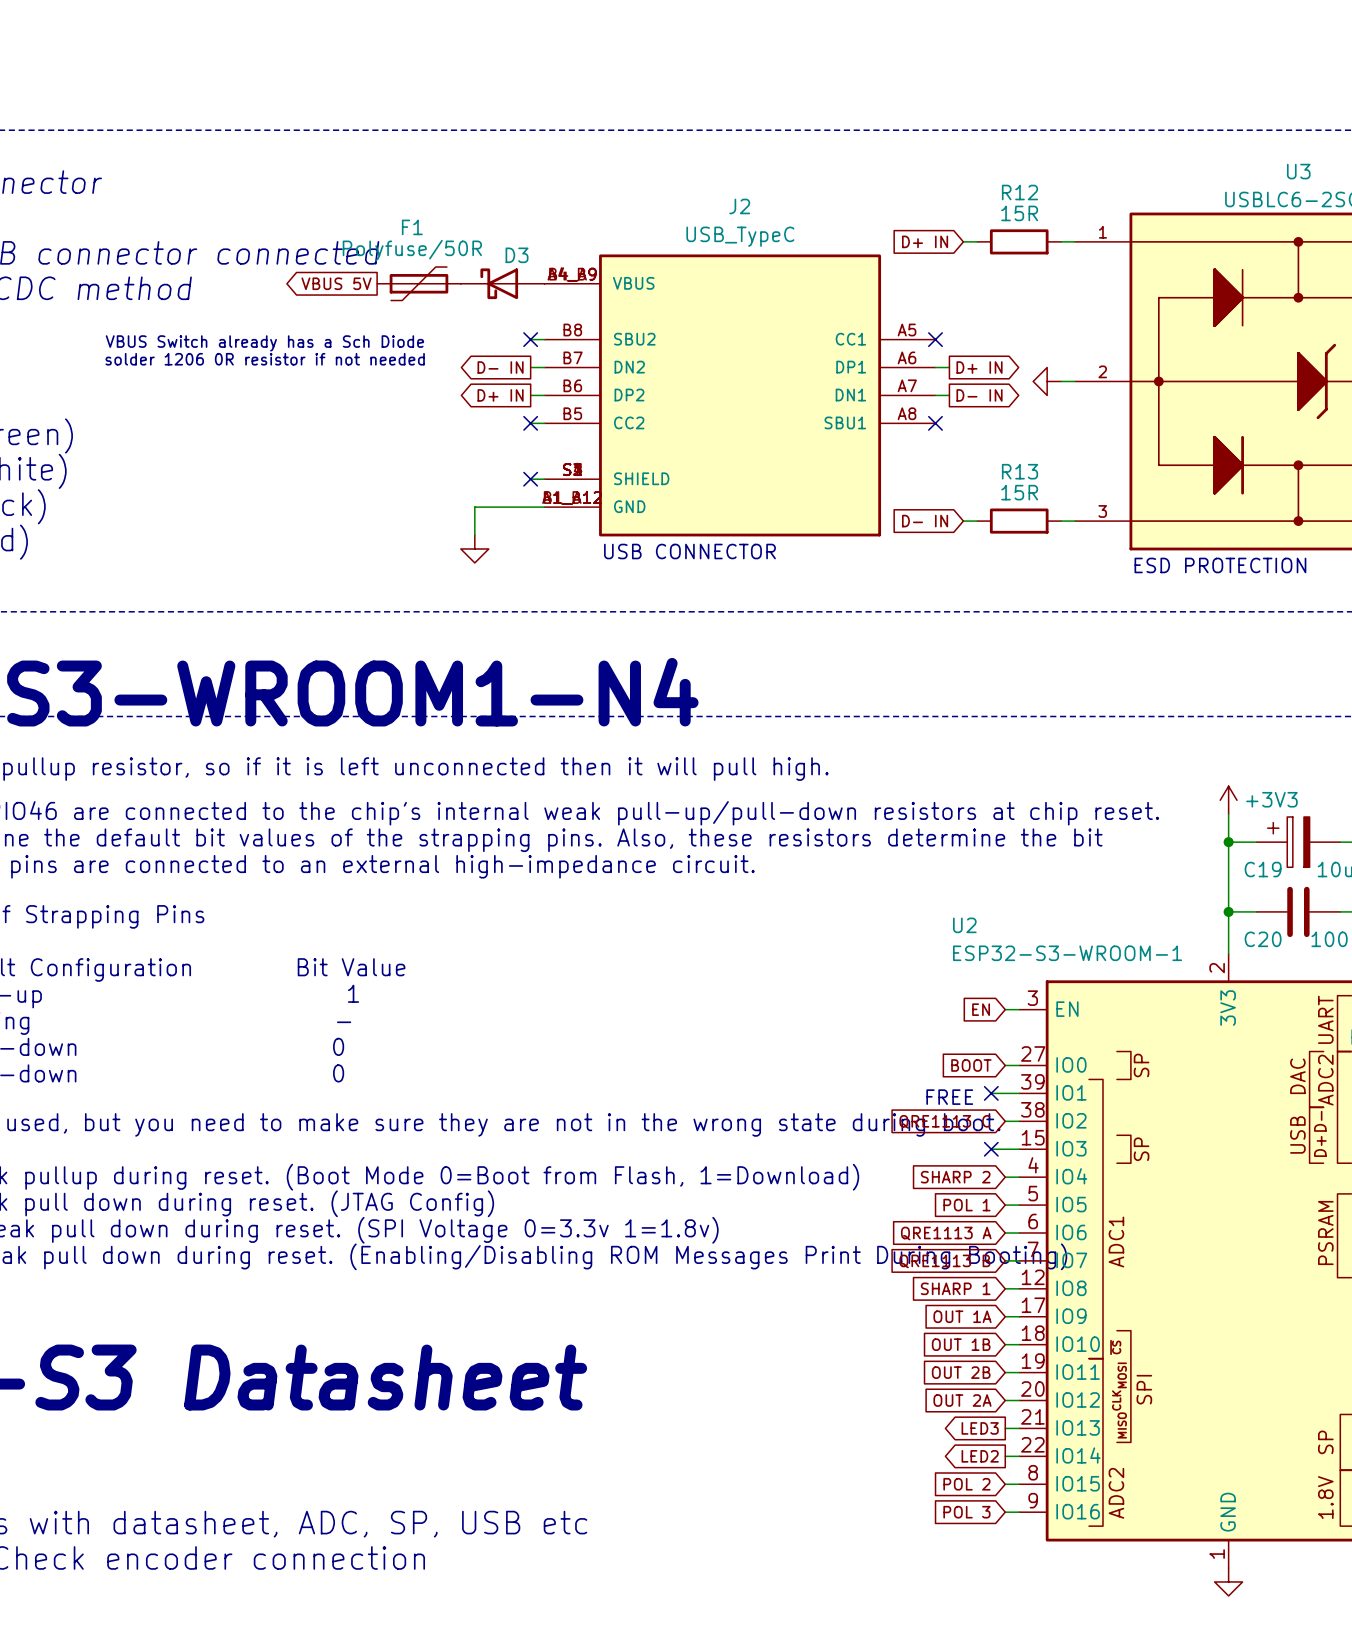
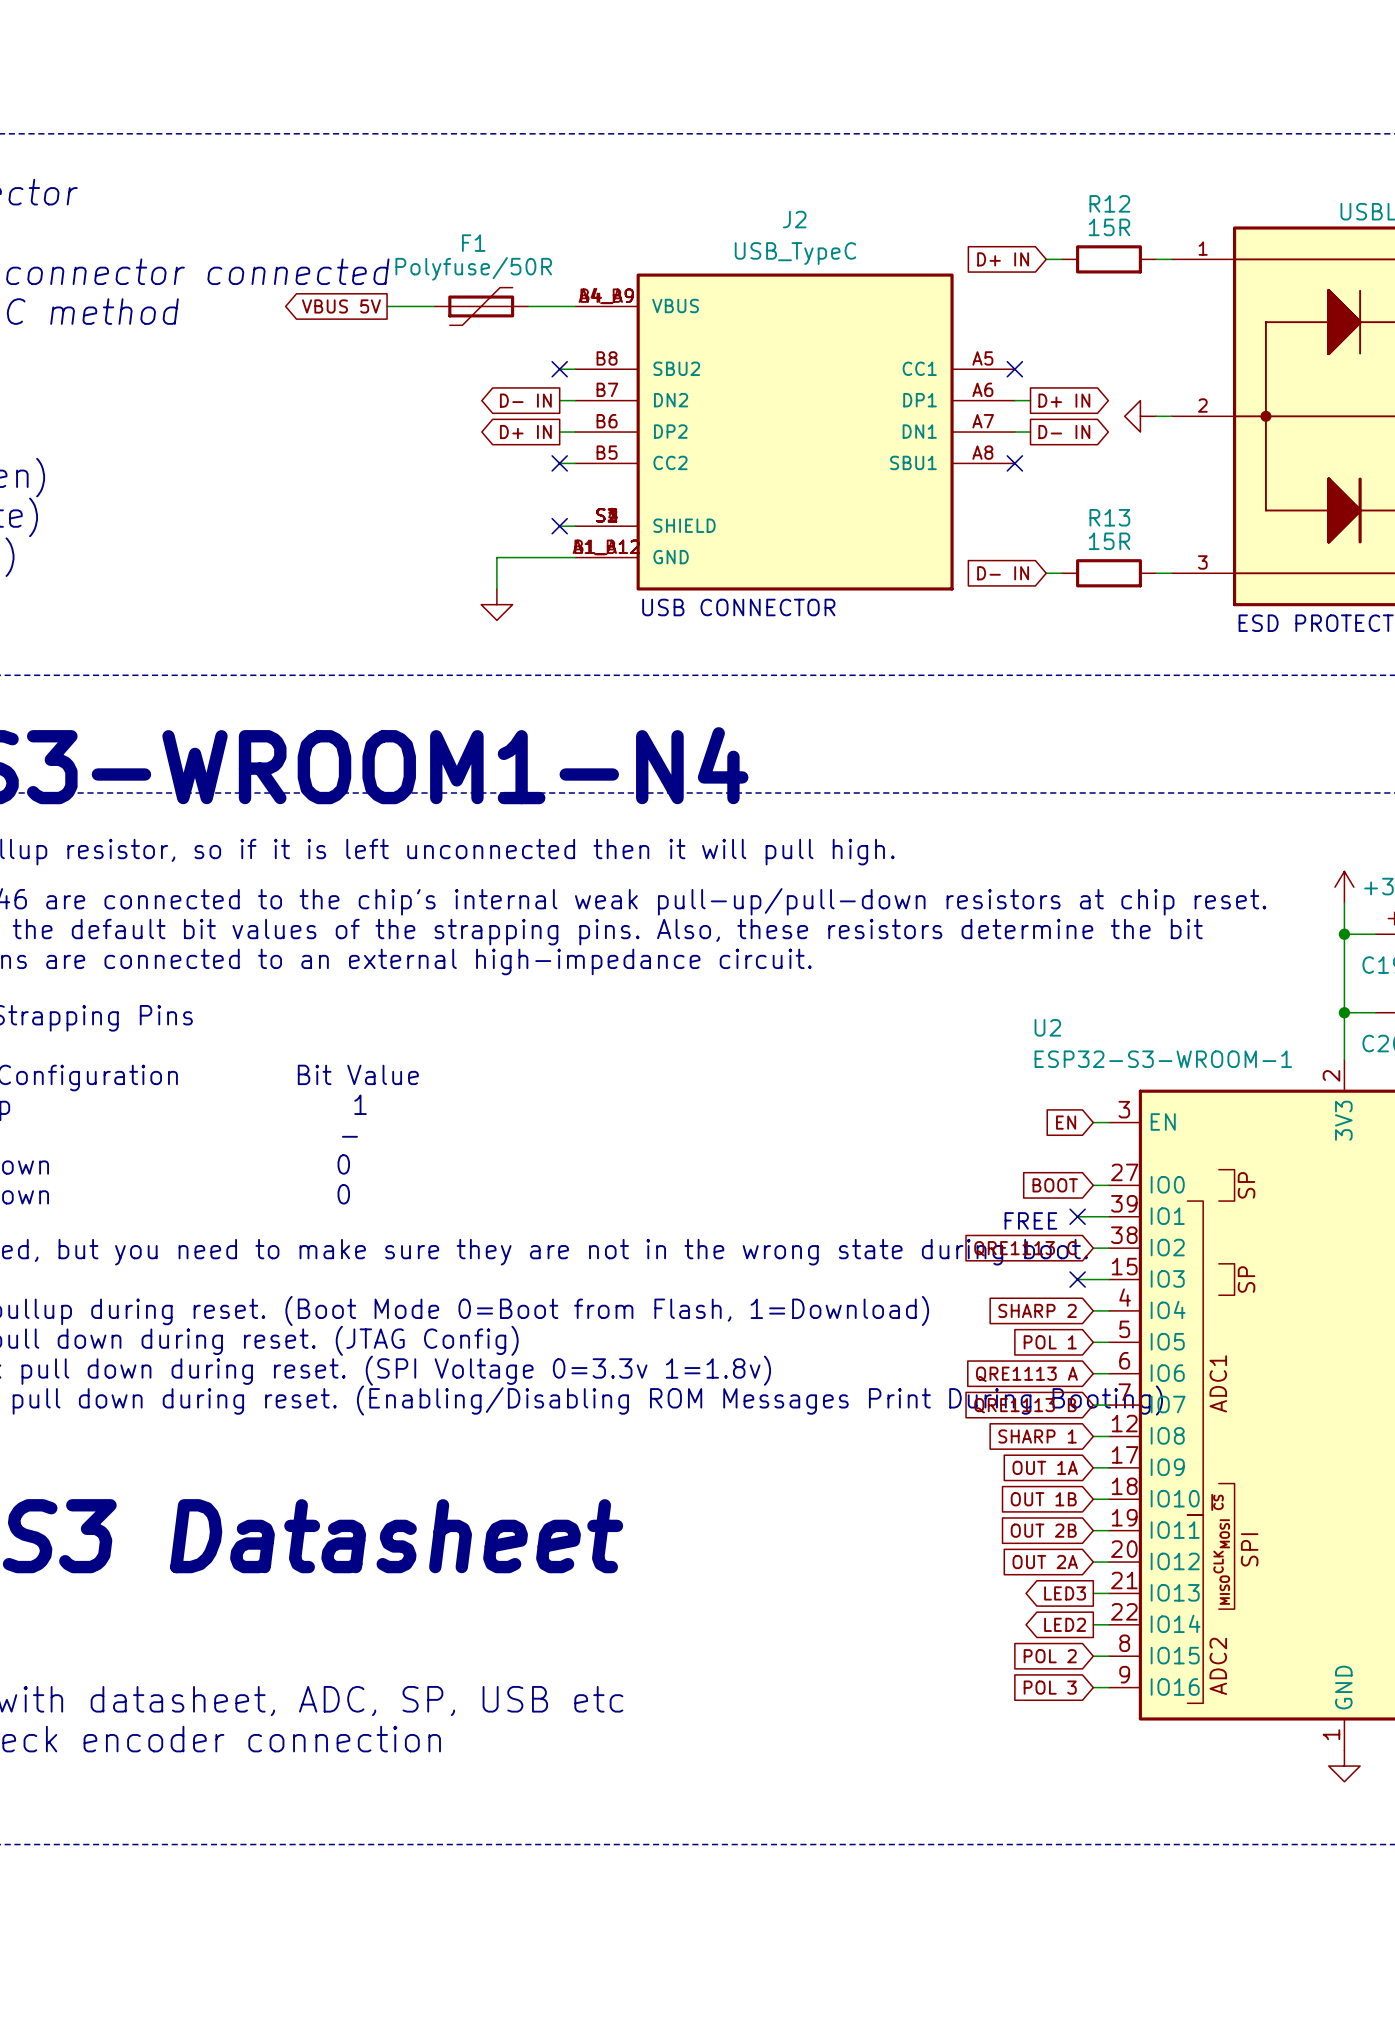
F1 position: (418, 283) -> (481, 306)
D3: (502, 283) -> none
text: VBUS Switch already has a Sch Diode (264, 343) -> none
text: solder 1206 0R resistor if not needed (265, 359) -> none

